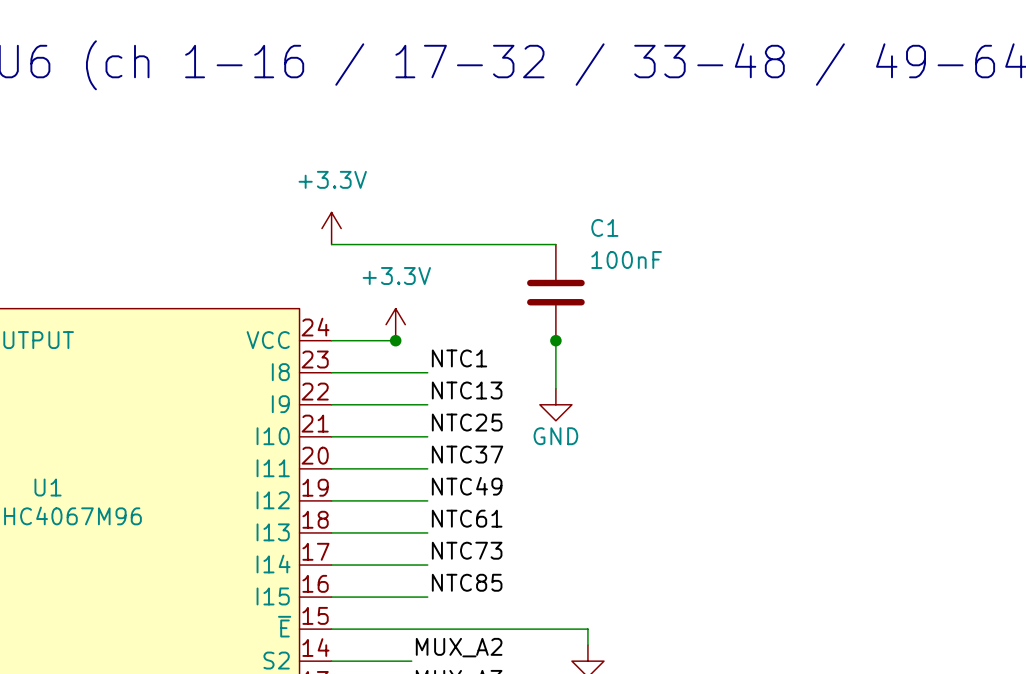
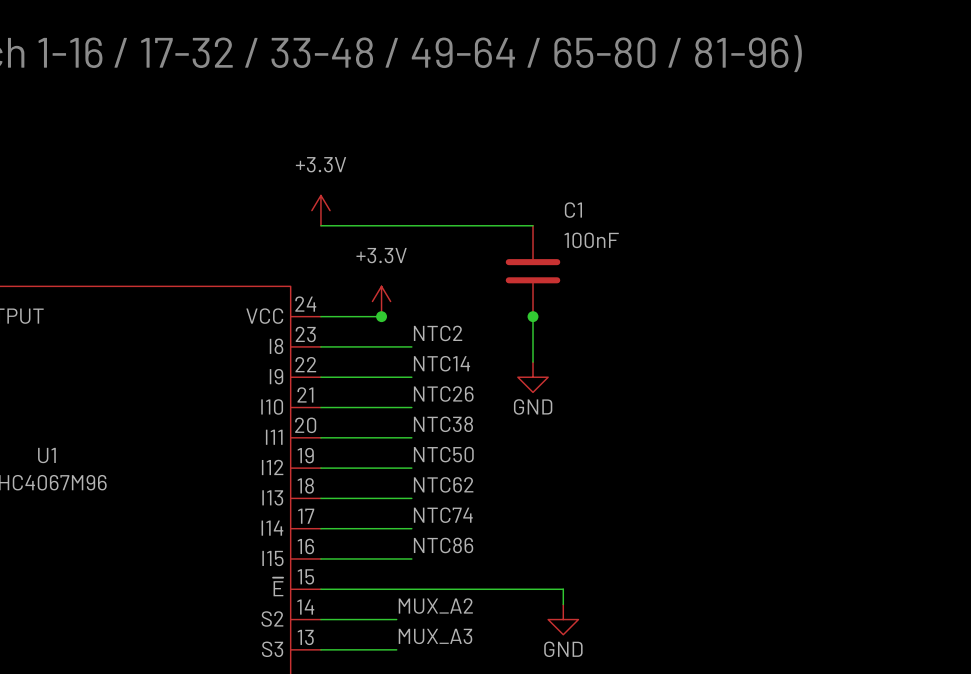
label: NTC1 (459, 358) -> NTC2 (438, 333)
label: NTC13 (467, 390) -> NTC14 (441, 363)
label: NTC25 (467, 422) -> NTC26 (443, 394)
label: NTC37 (467, 454) -> NTC38 (443, 424)
label: NTC49 (467, 486) -> NTC50 (443, 454)
label: NTC61 (467, 518) -> NTC62 (443, 484)
label: NTC73 (467, 550) -> NTC74 (443, 515)
label: NTC85 (467, 582) -> NTC86 (443, 545)

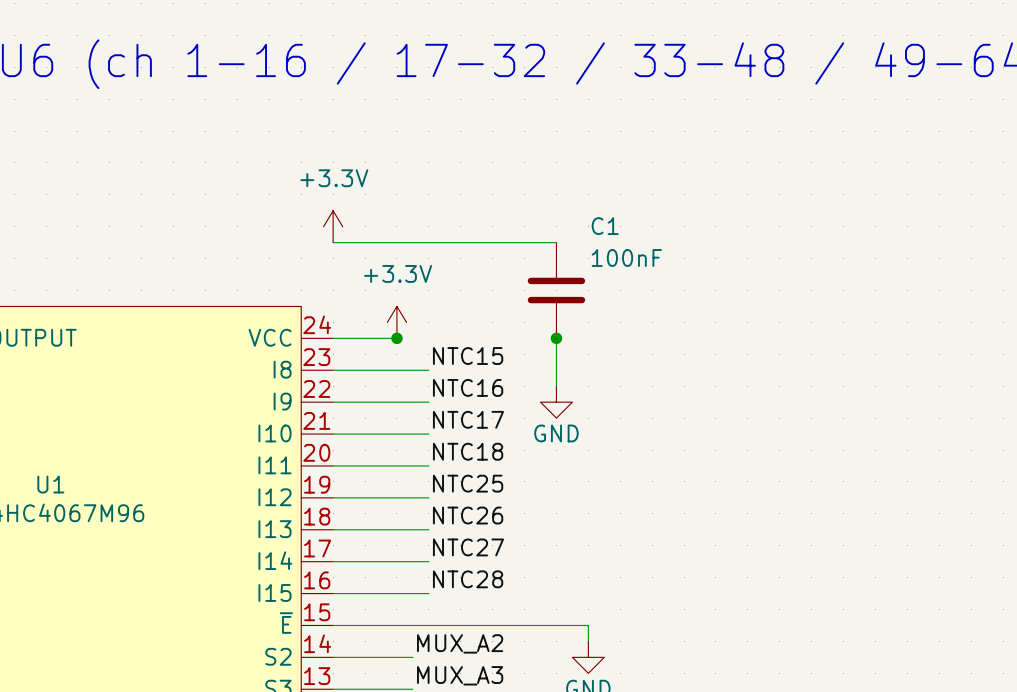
label: NTC2 (438, 333) -> NTC15 (468, 356)
label: NTC14 (441, 363) -> NTC16 (468, 387)
label: NTC26 (443, 394) -> NTC17 (468, 419)
label: NTC38 (443, 424) -> NTC18 (468, 451)
label: NTC50 (443, 454) -> NTC25 (468, 483)
label: NTC62 (443, 484) -> NTC26 (468, 515)
label: NTC74 (443, 515) -> NTC27 (468, 547)
label: NTC86 (443, 545) -> NTC28 (468, 579)

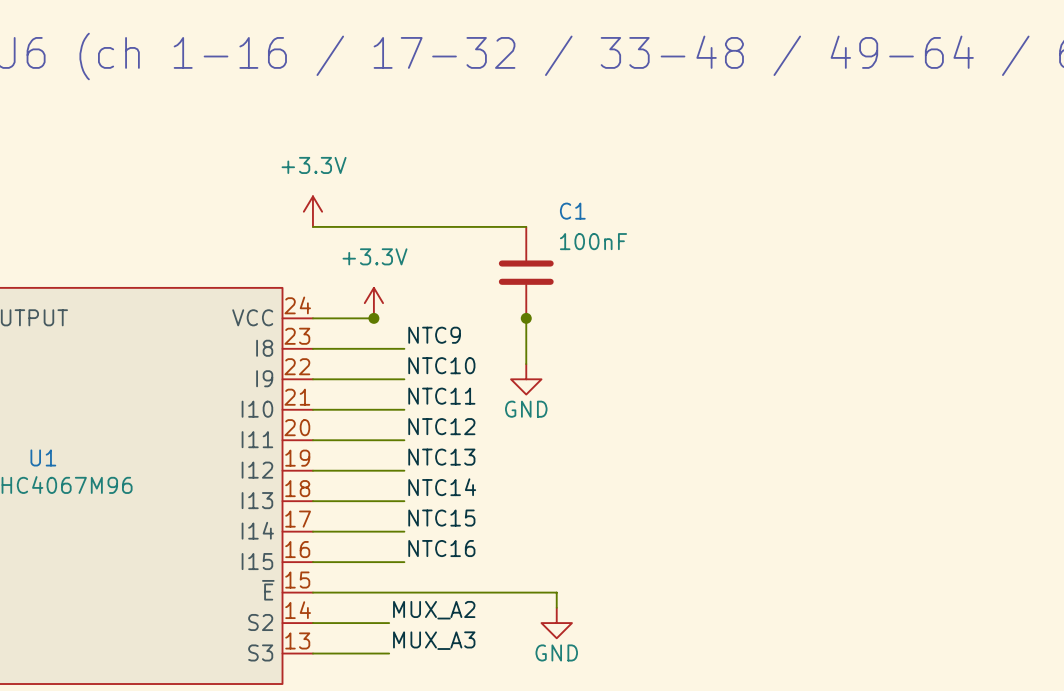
label: NTC15 (468, 356) -> NTC9 (434, 335)
label: NTC16 (468, 387) -> NTC10 (441, 365)
label: NTC17 (468, 419) -> NTC11 (441, 396)
label: NTC18 (468, 451) -> NTC12 (441, 426)
label: NTC25 (468, 483) -> NTC13 (441, 457)
label: NTC26 (468, 515) -> NTC14 (442, 487)
label: NTC27 (468, 547) -> NTC15 (441, 518)
label: NTC28 (468, 579) -> NTC16 (441, 548)

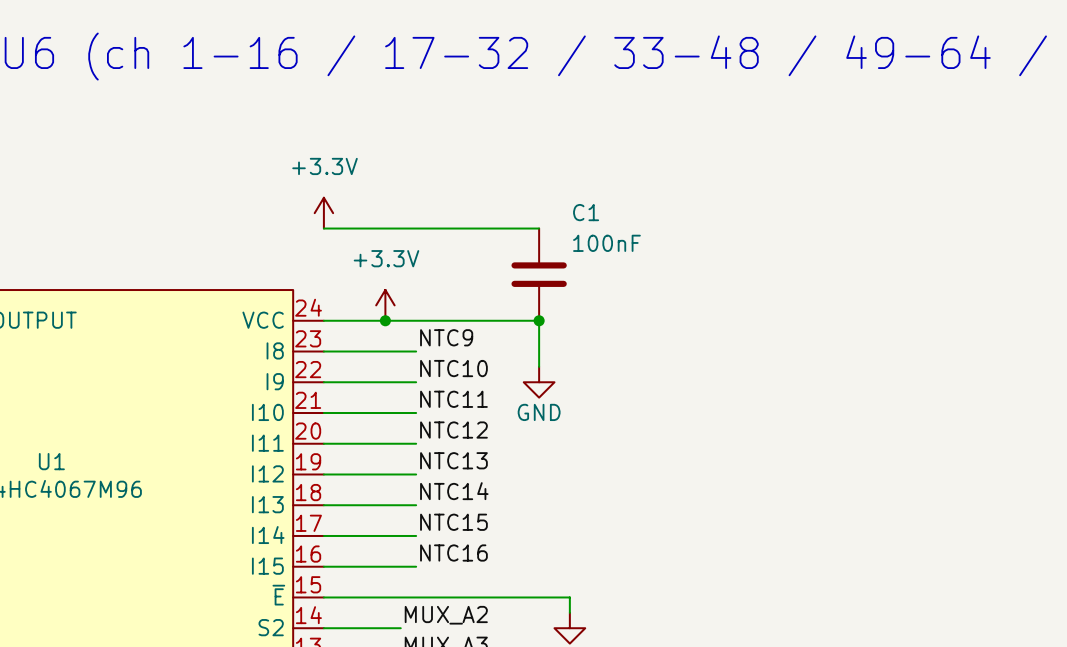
wire: none -> (385, 320) (539, 320)

